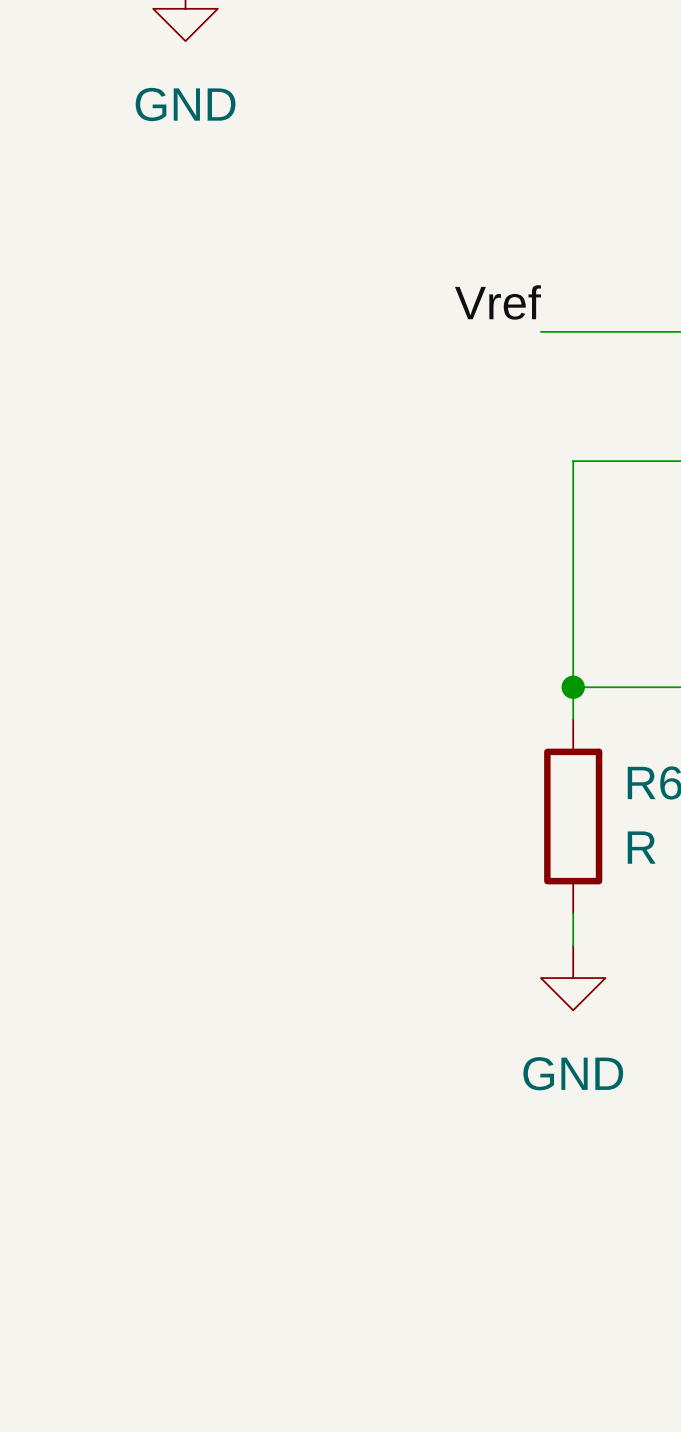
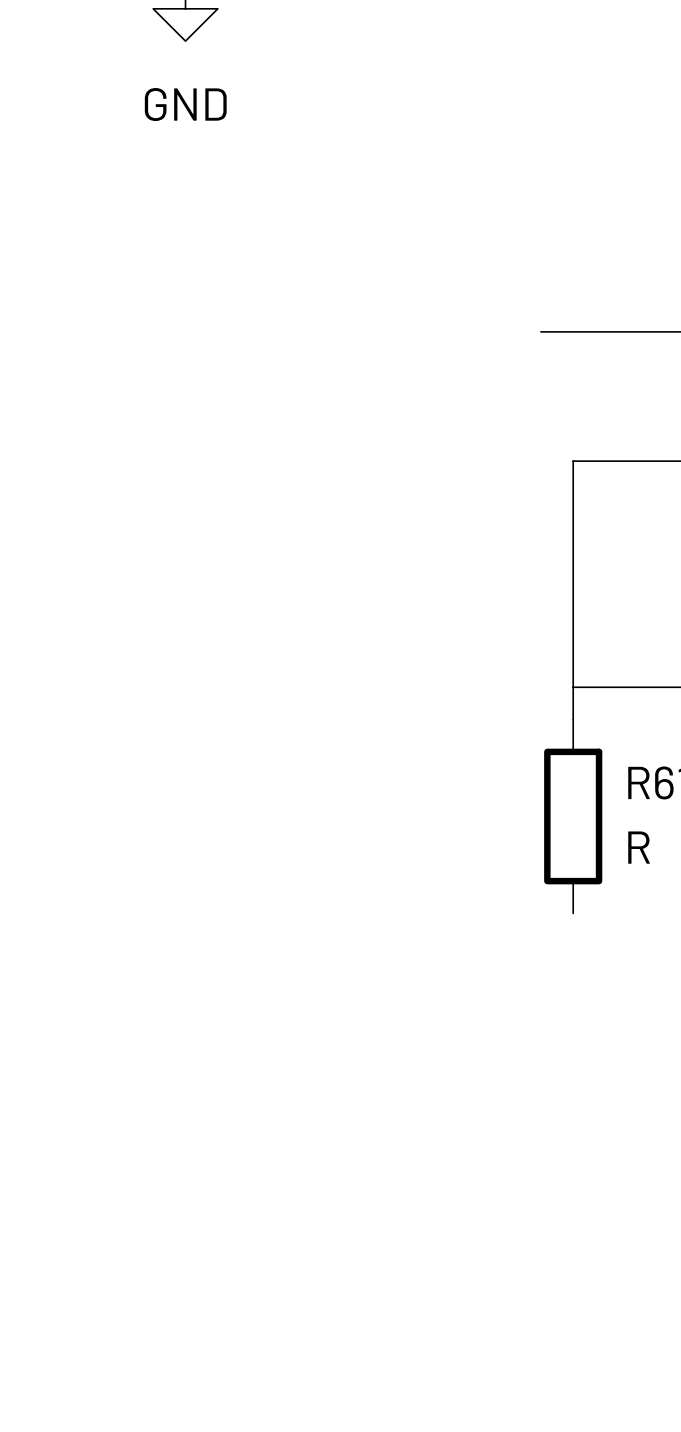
label: Vref (497, 302) -> none
junction: (573, 687) -> none
wire: (573, 913) (573, 945) -> none
power symbol: GND (573, 978) -> none

